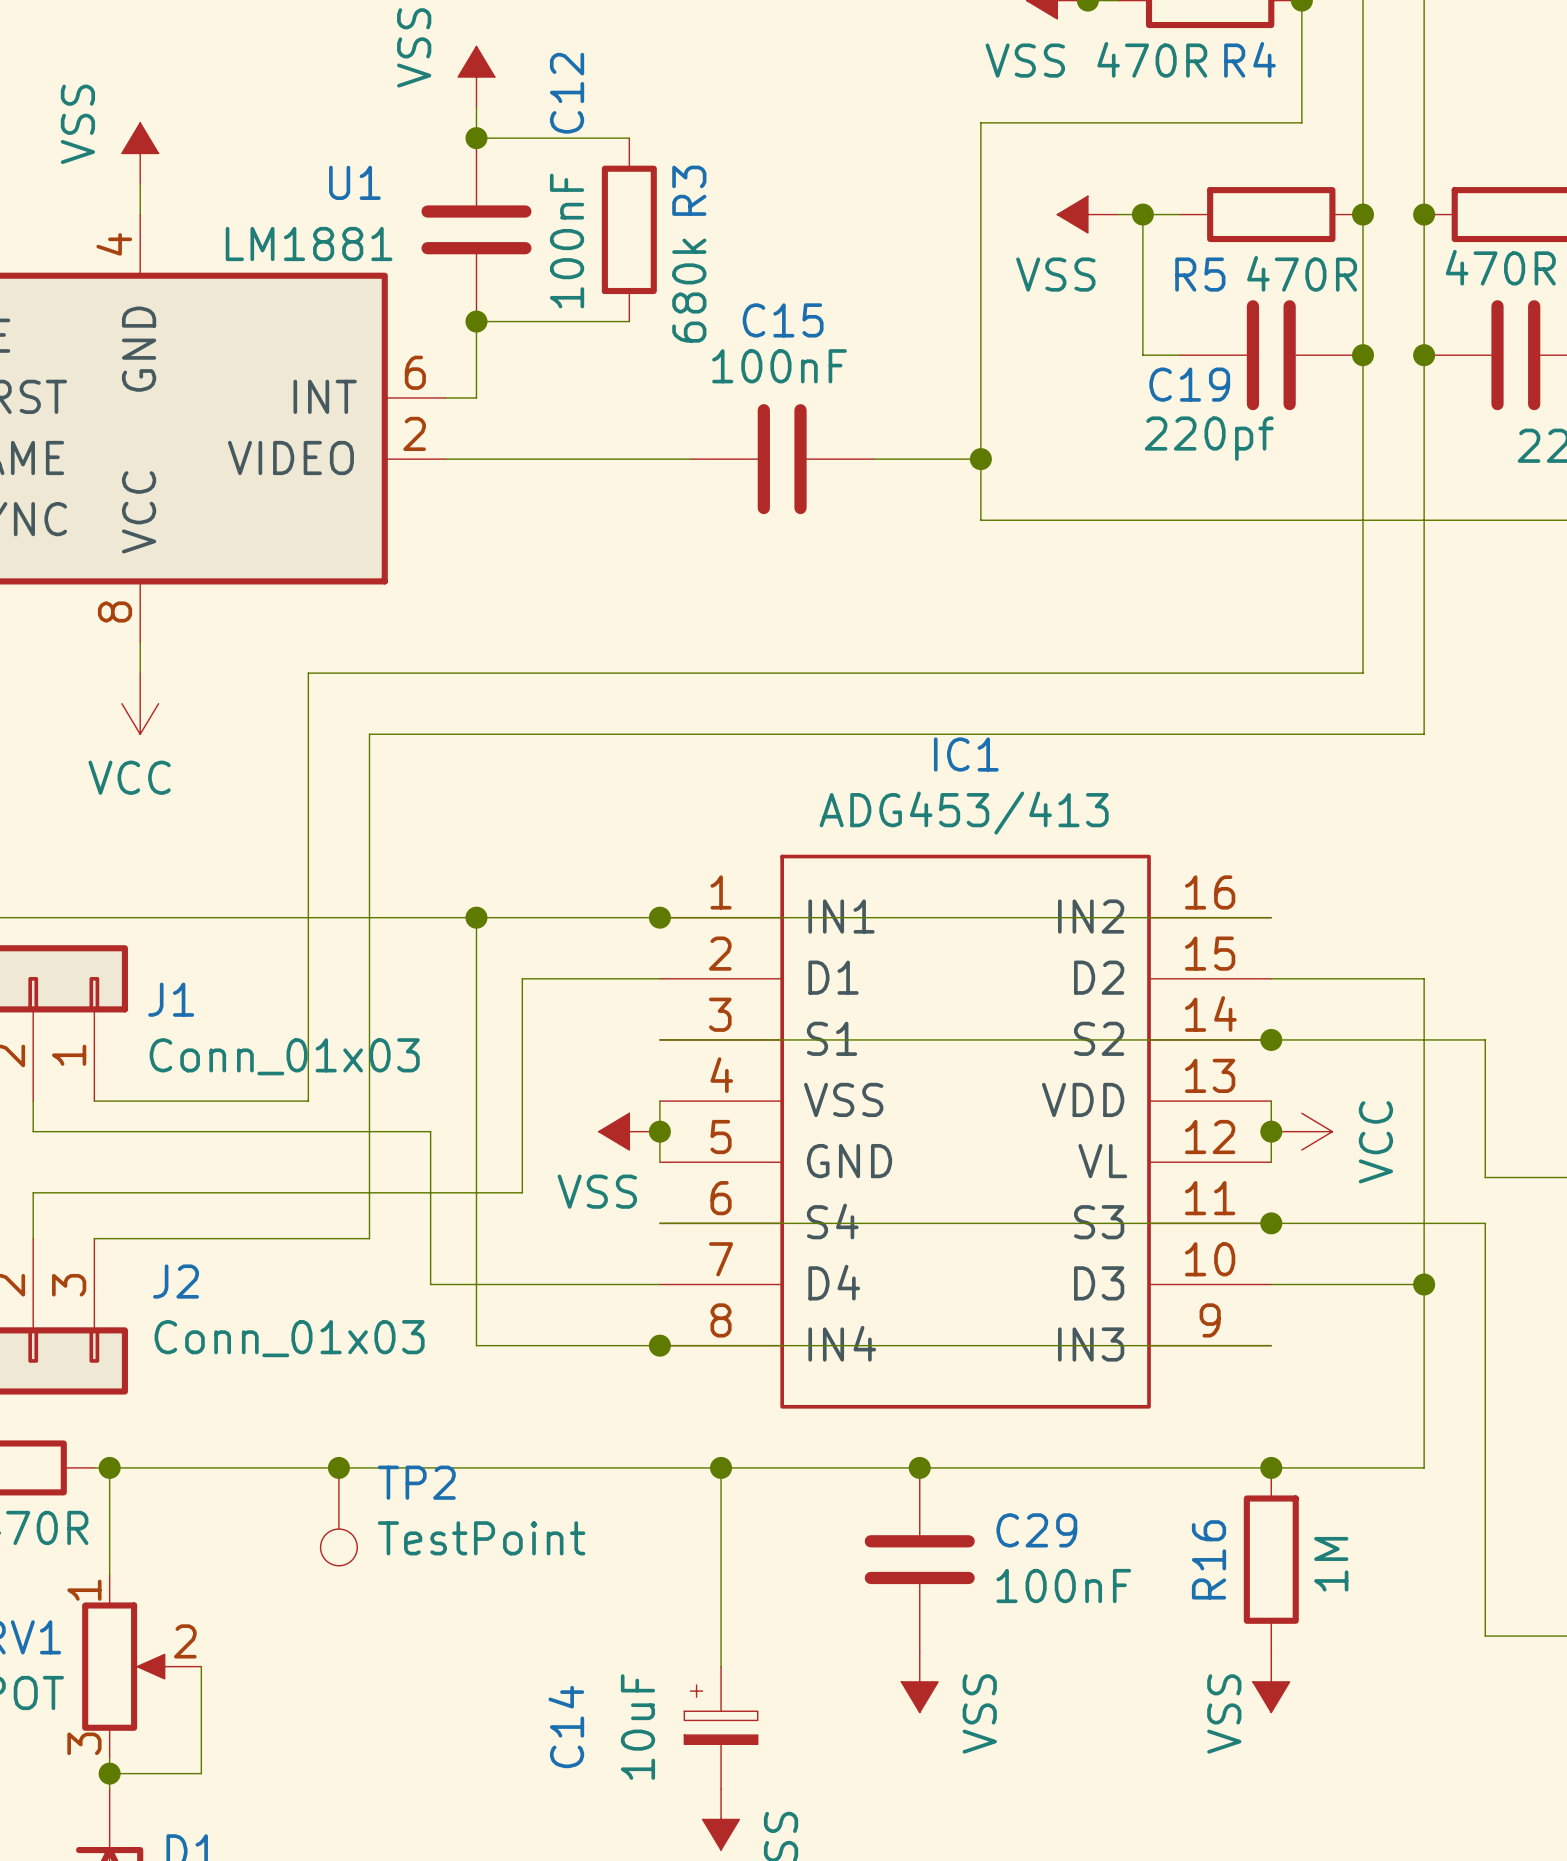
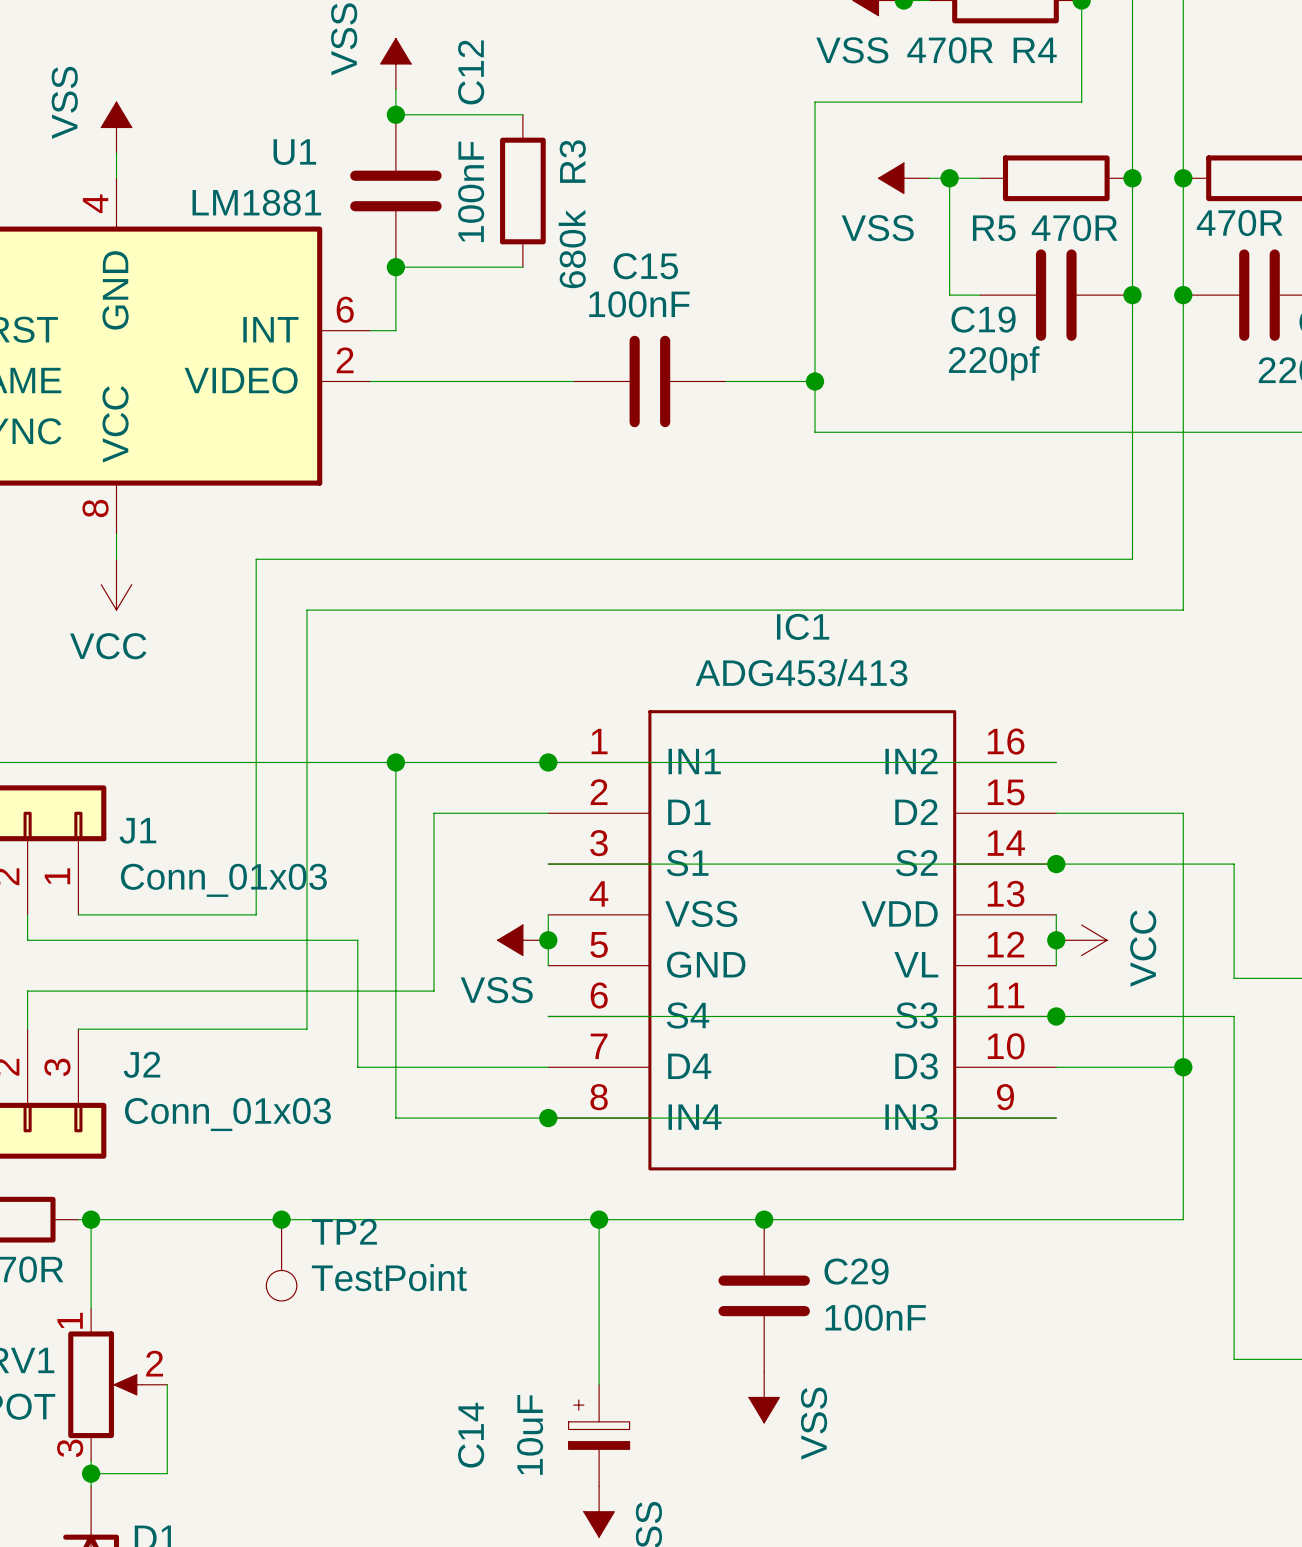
junction: (1271, 1467) -> none
R16: 1M (1271, 1559) -> none
power symbol: VSS (1271, 1681) -> none

